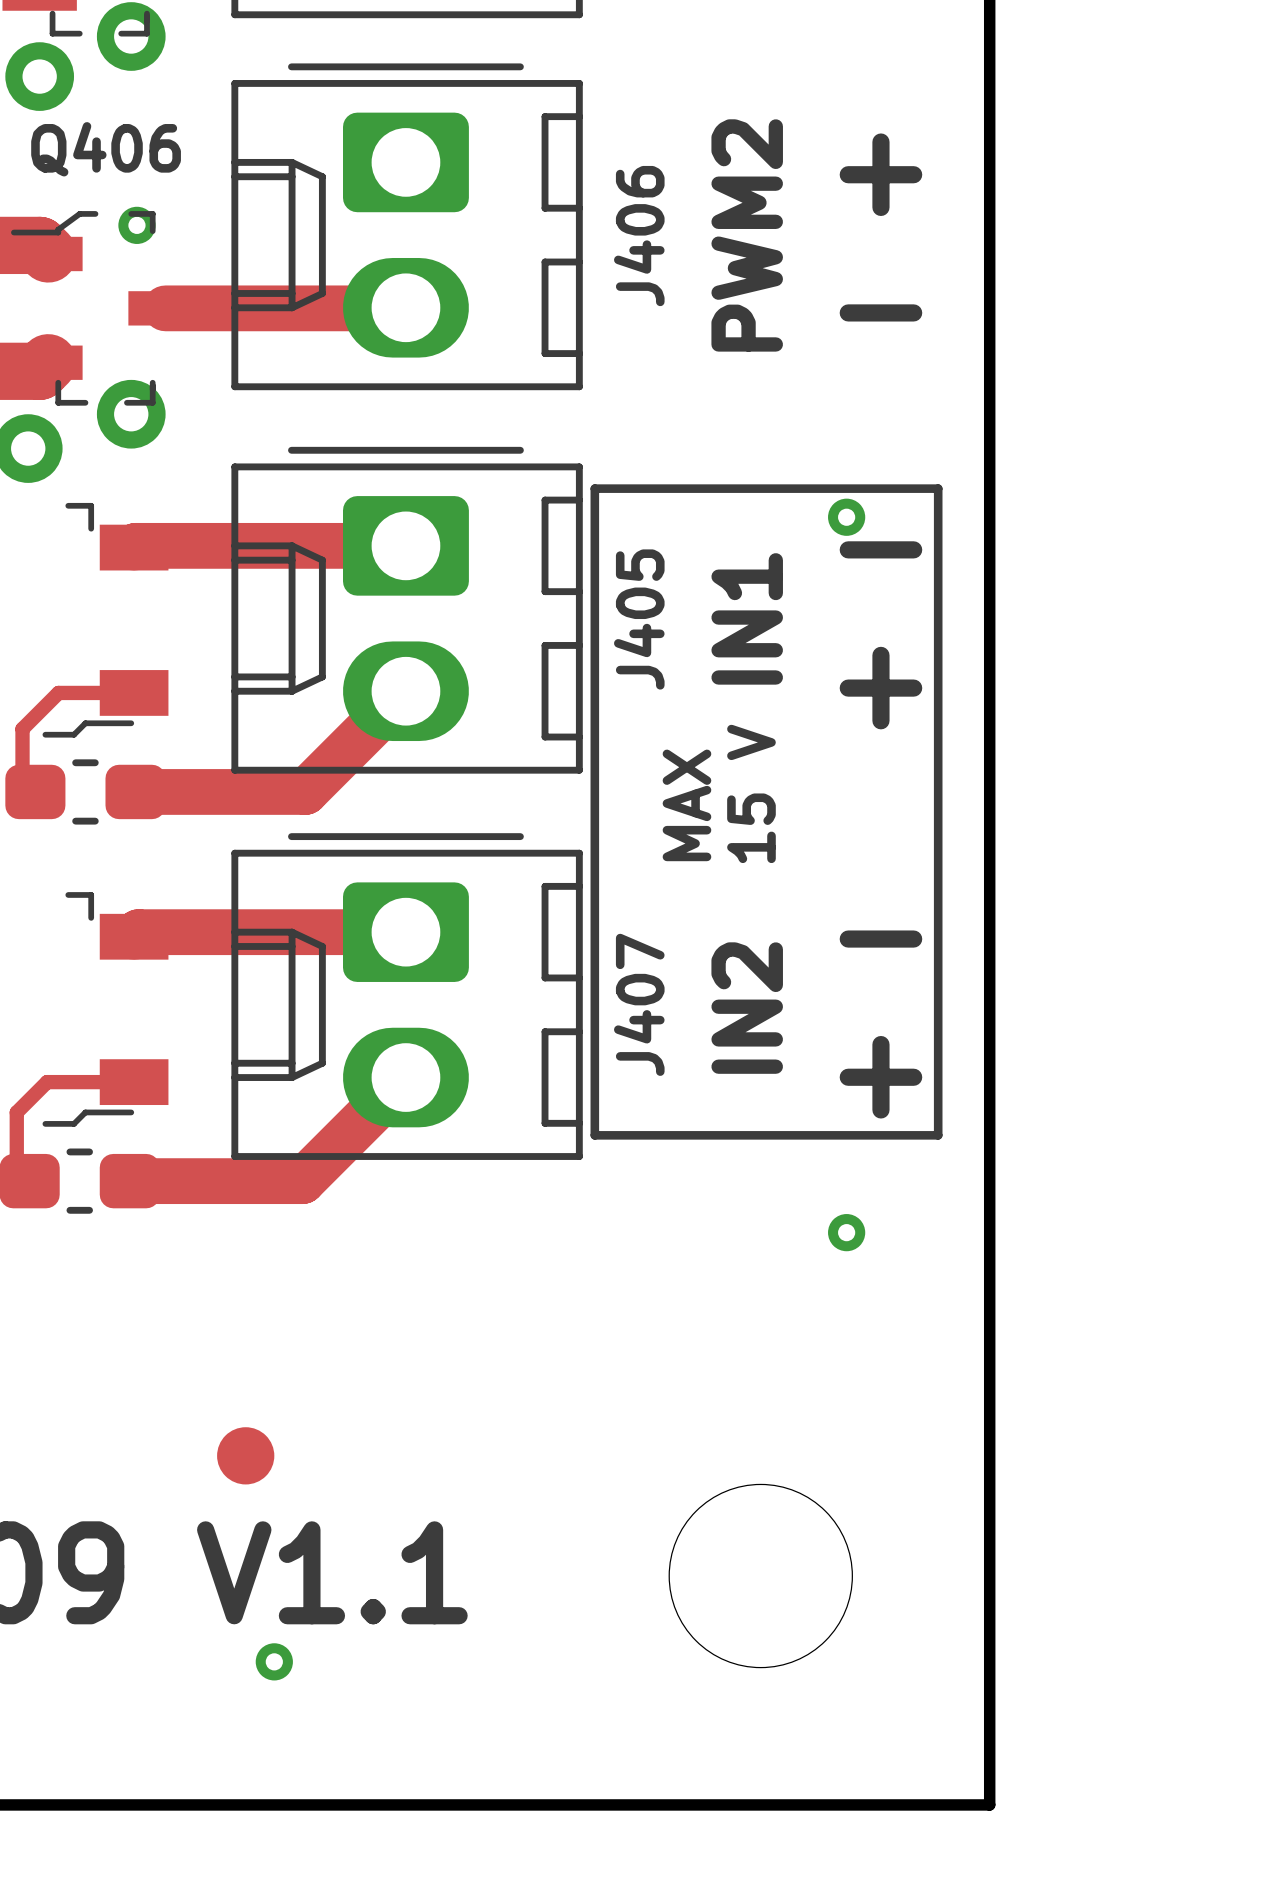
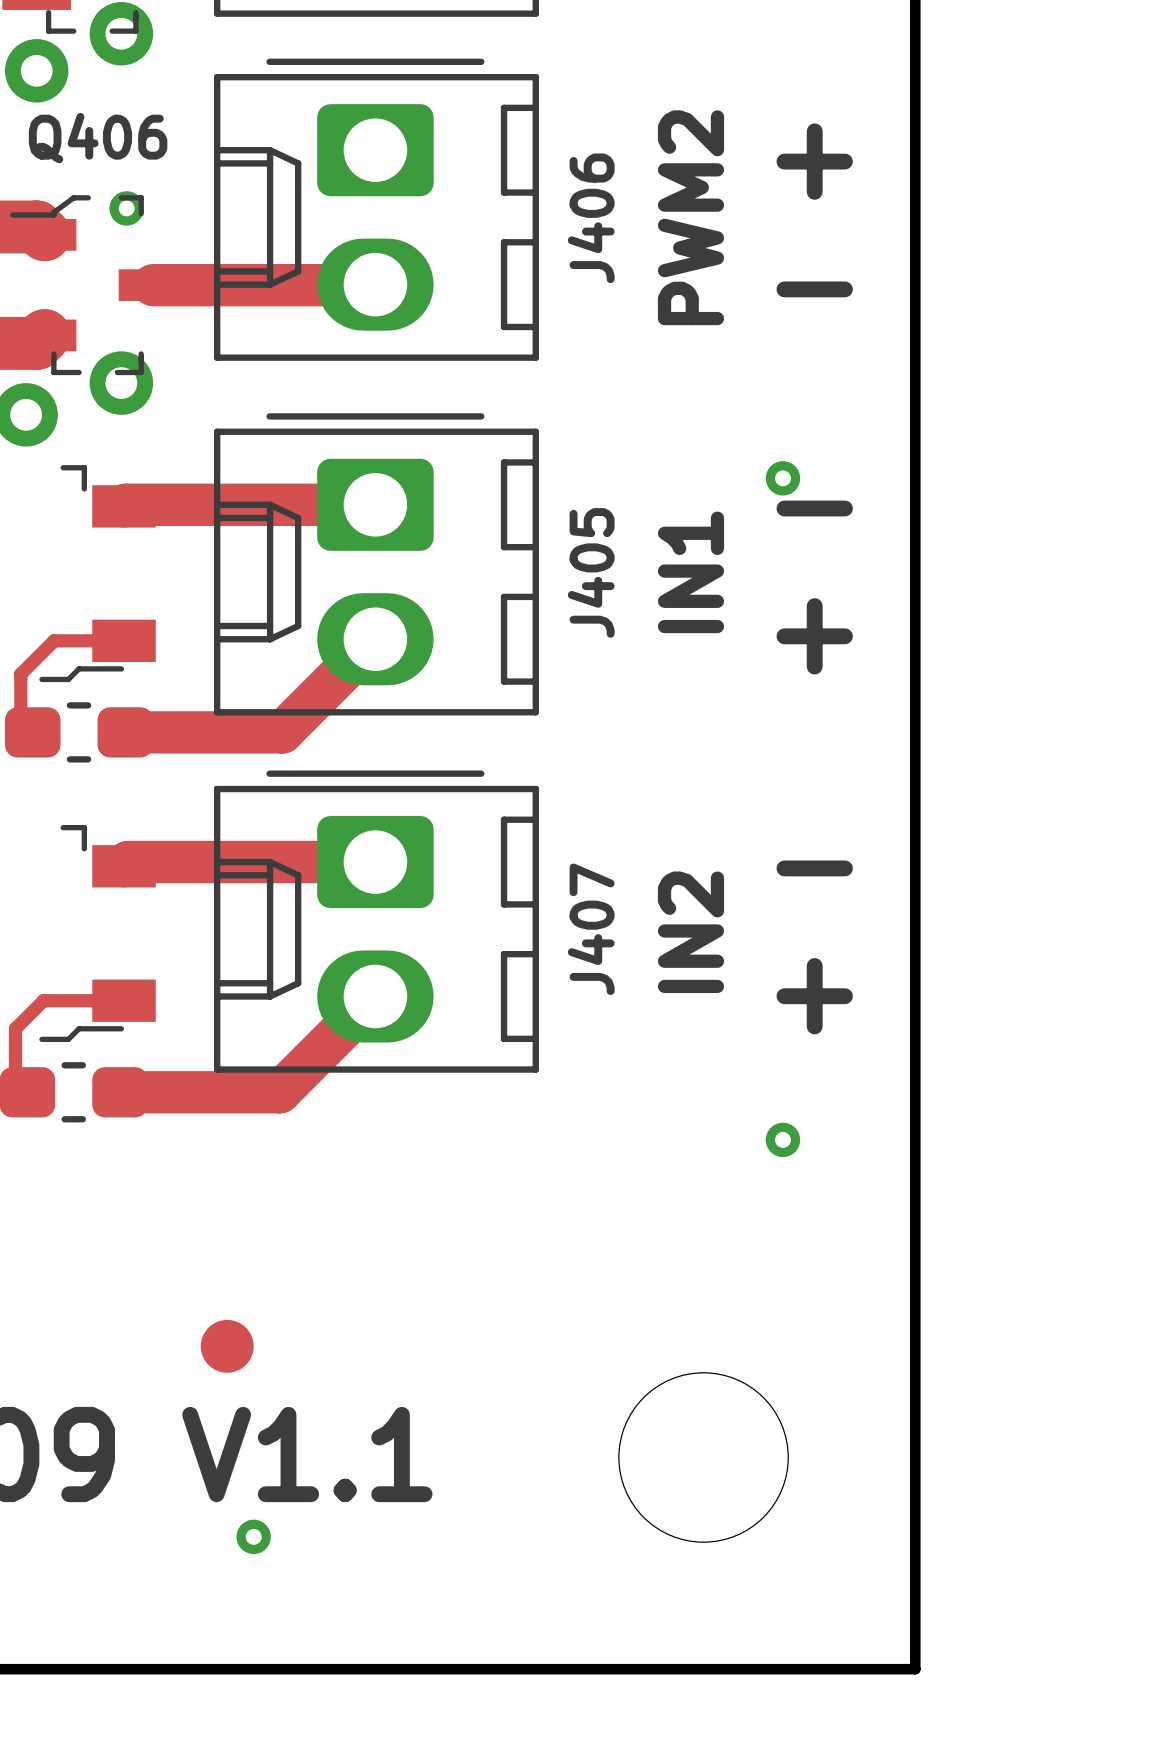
line: (594, 488) (938, 488) (938, 1135) (594, 1135) (594, 488) -> none
text: 15 V (751, 793) -> none
text: MAX (686, 805) -> none

